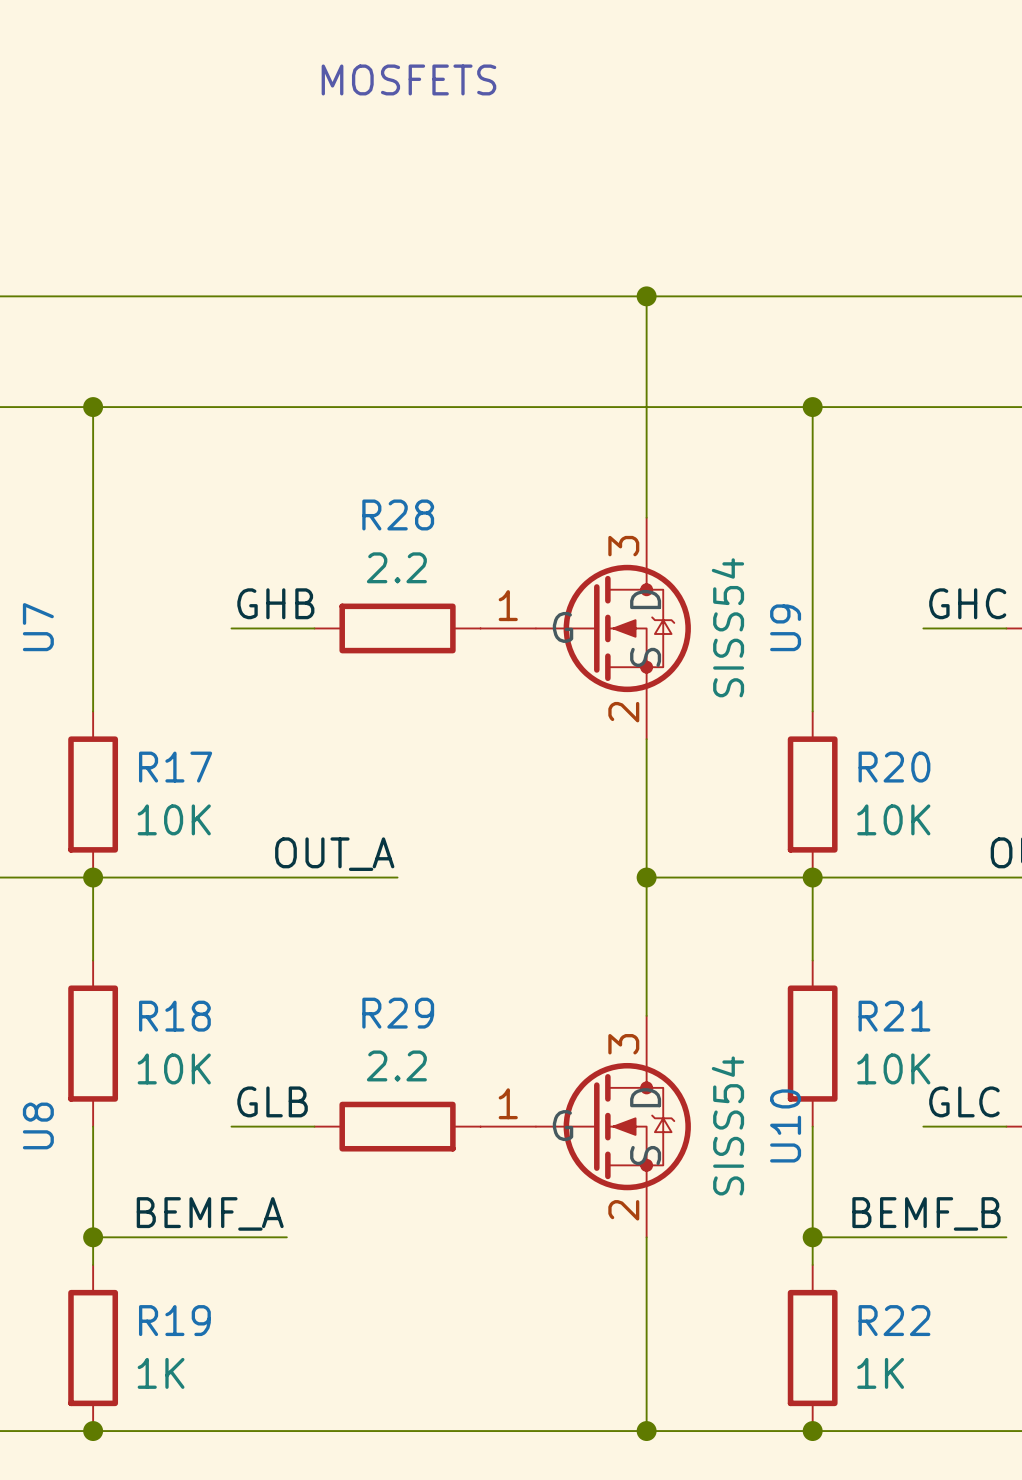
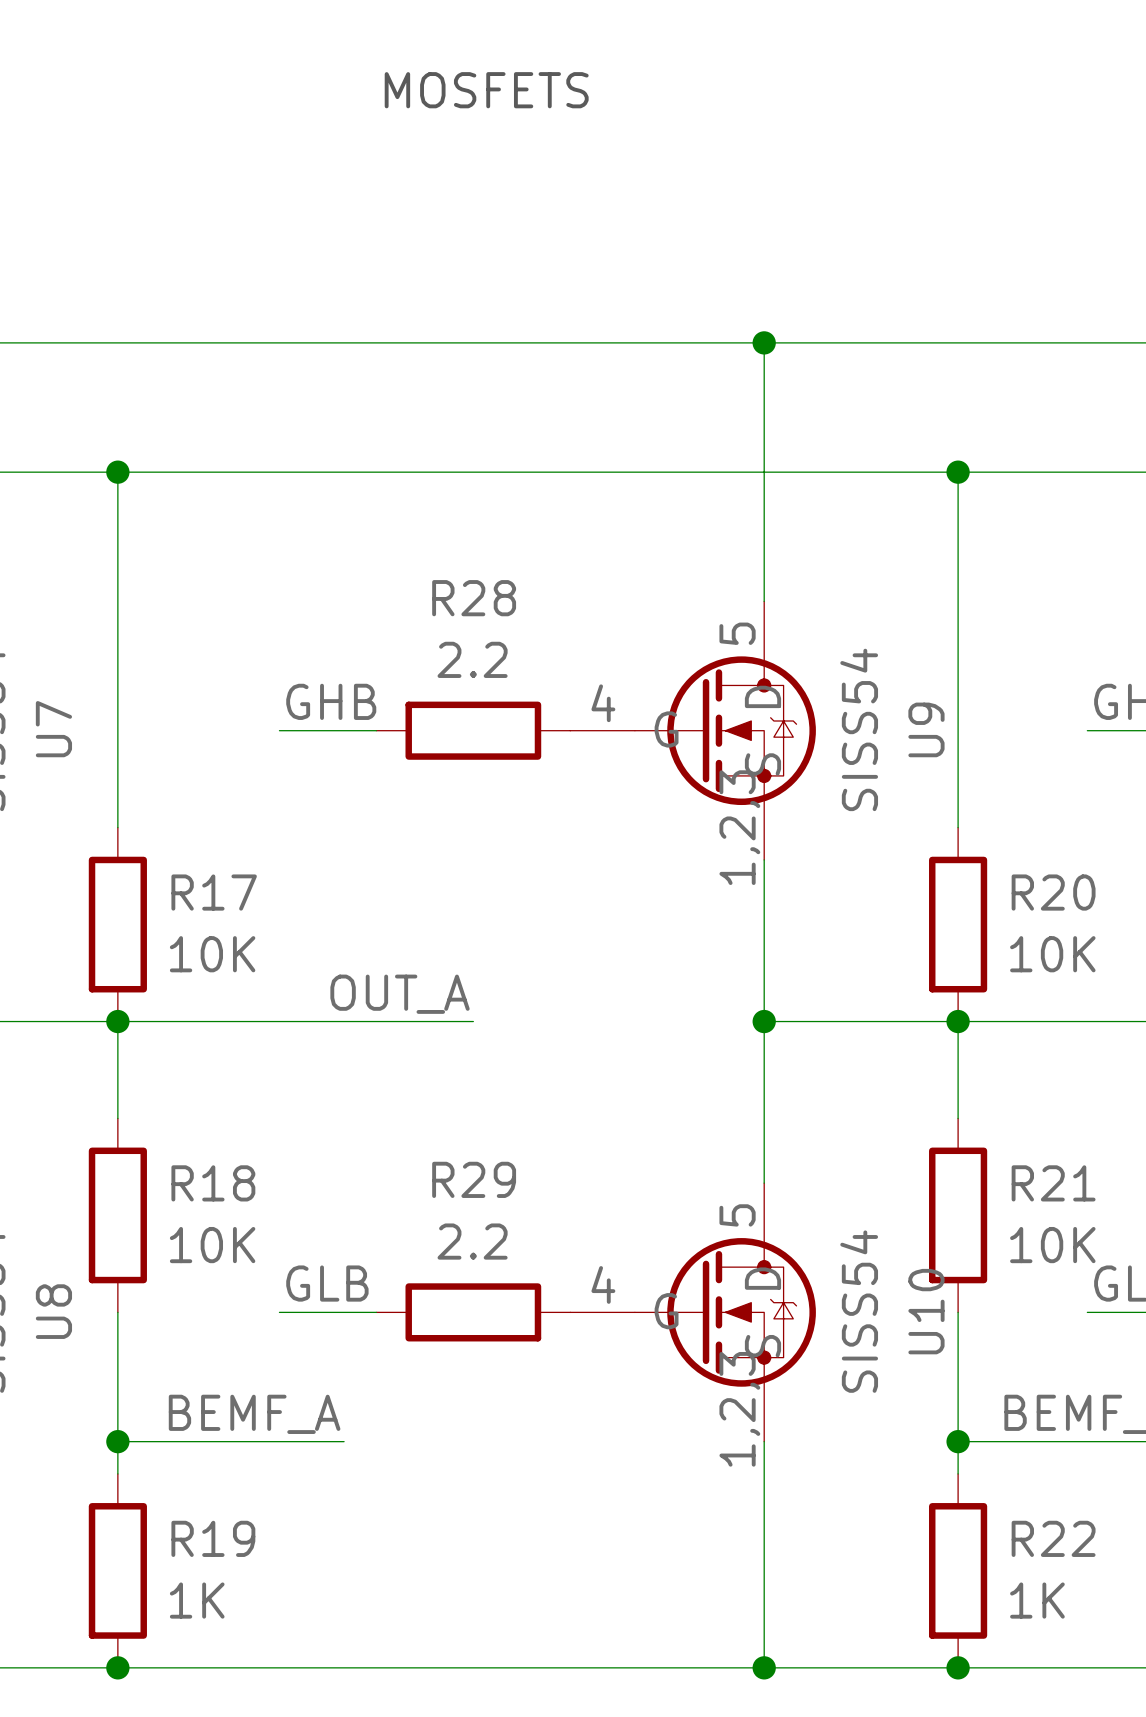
U9 pin number: 3 (623, 546) -> 5 (737, 633)
U9 pin number: 1 (508, 605) -> 4 (603, 703)
U9 pin number: 2 (623, 712) -> 1,2,3 (739, 827)
U10 pin number: 3 (623, 1044) -> 5 (737, 1215)
U10 pin number: 1 (508, 1103) -> 4 (603, 1284)
U10 pin number: 2 (623, 1210) -> 1,2,3 (739, 1409)

